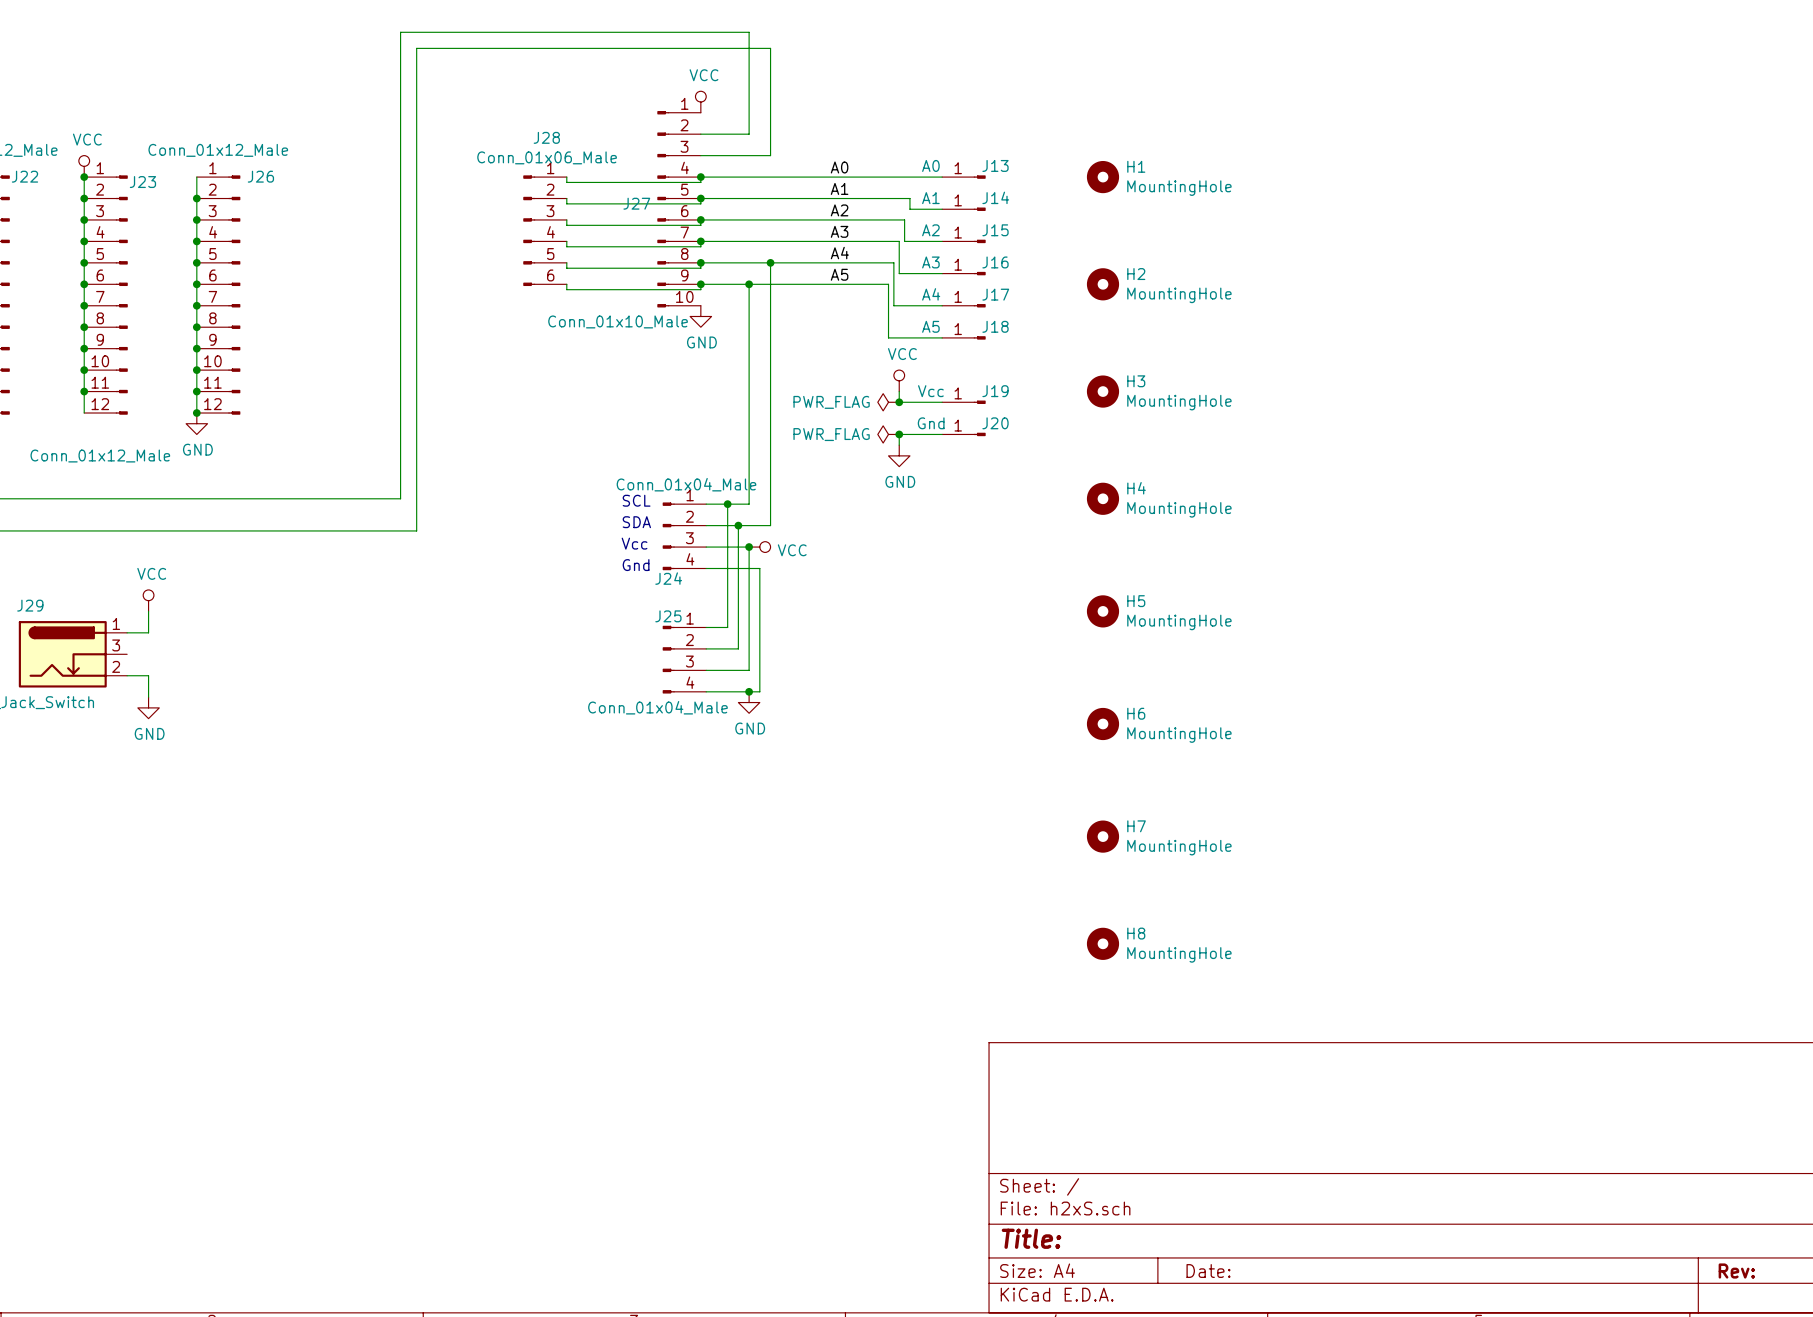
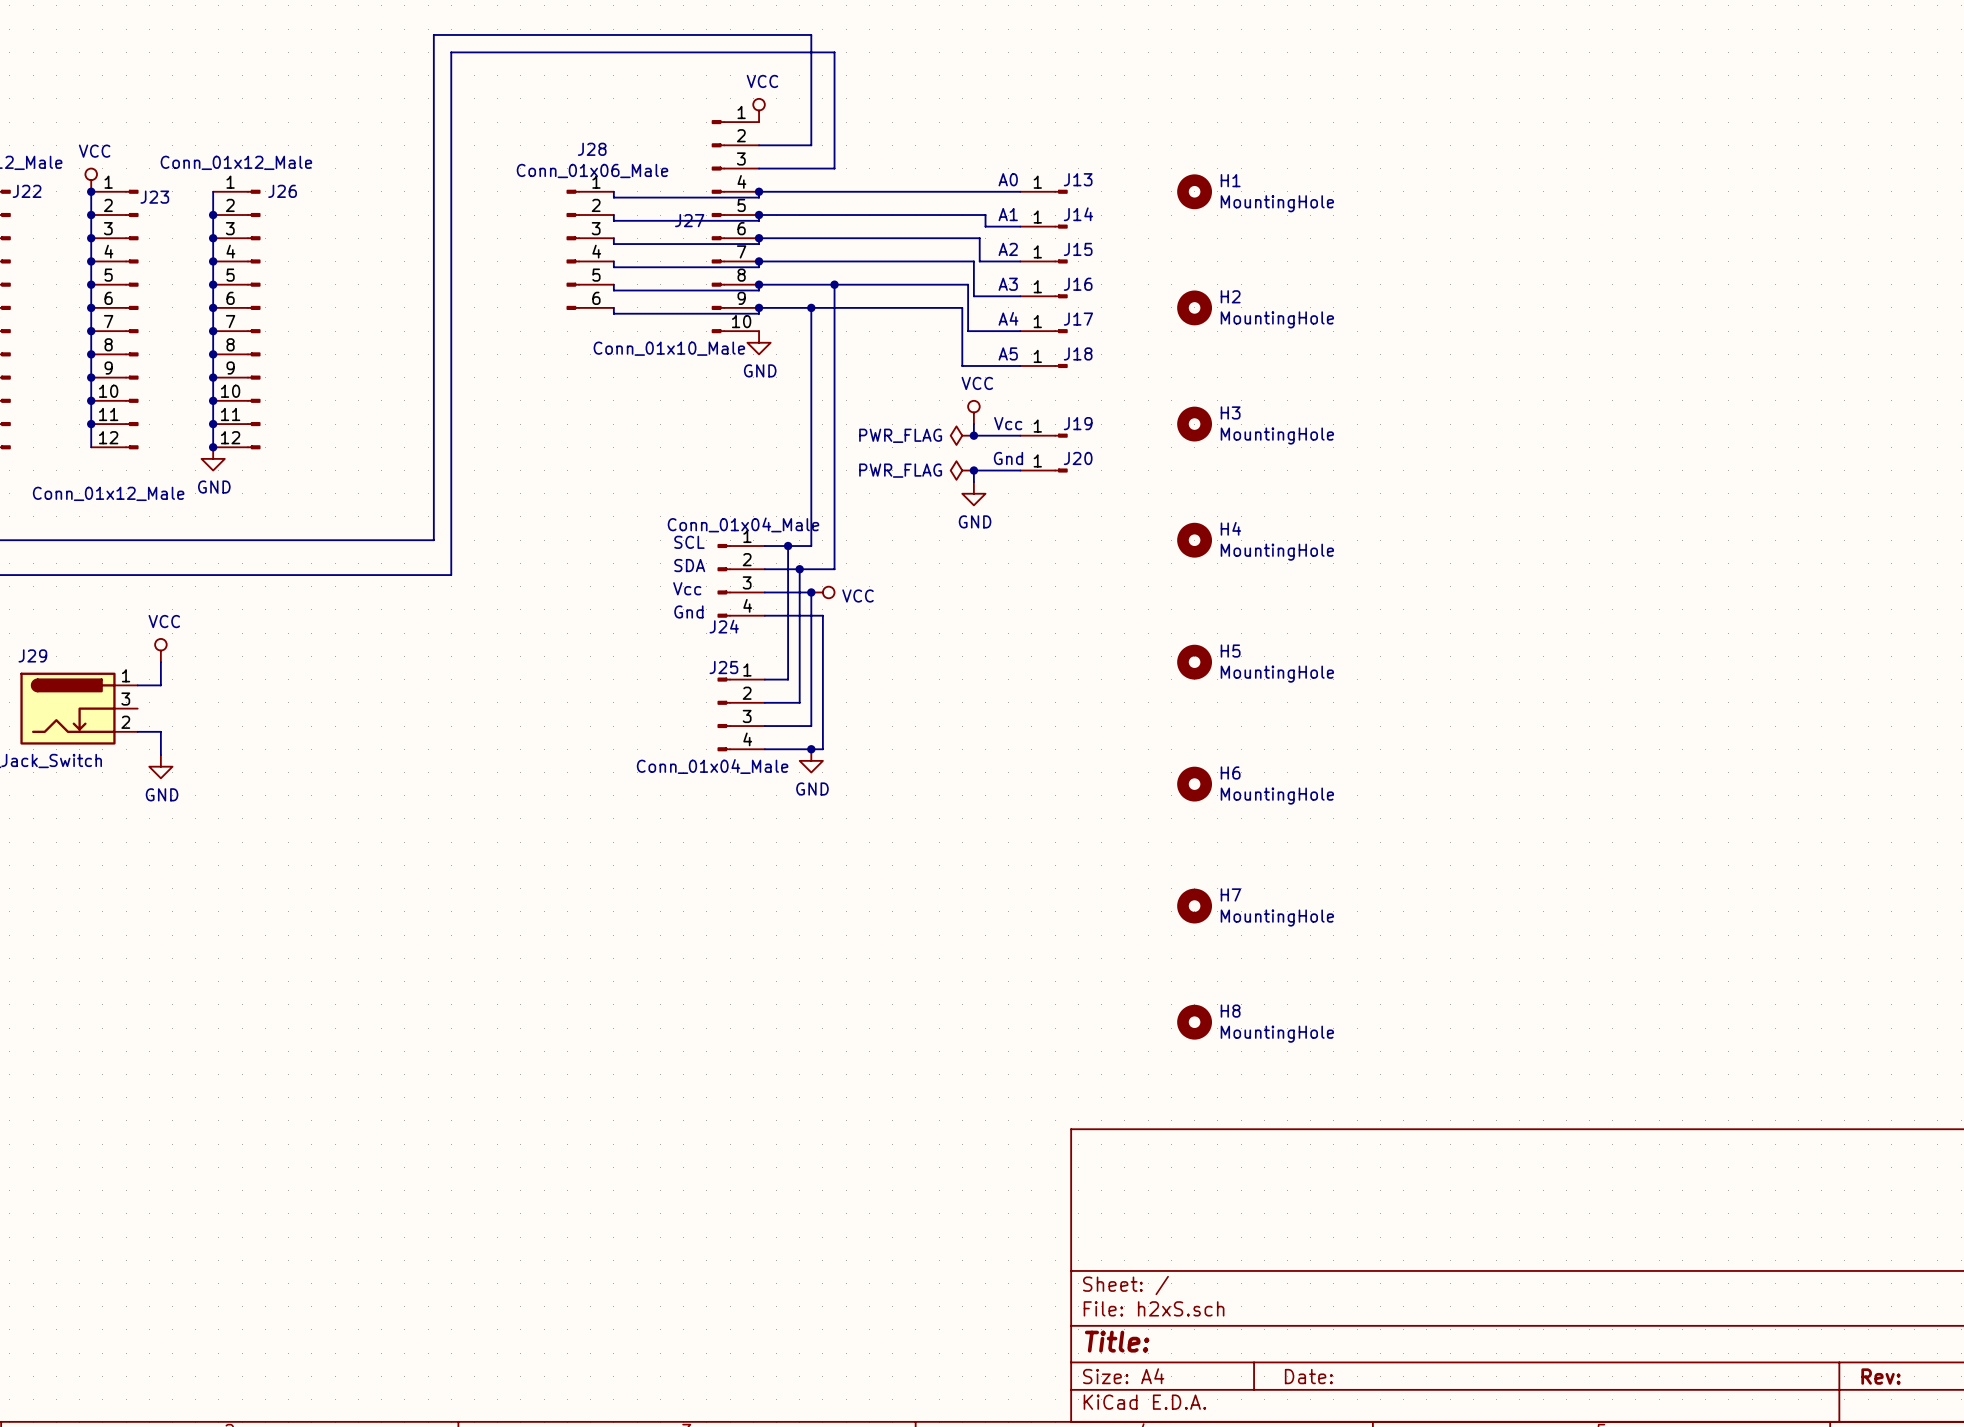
label: A0 (839, 167) -> none
label: A1 (839, 188) -> none
label: A2 (839, 210) -> none
label: A3 (839, 231) -> none
label: A4 (839, 253) -> none
label: A5 (839, 274) -> none

